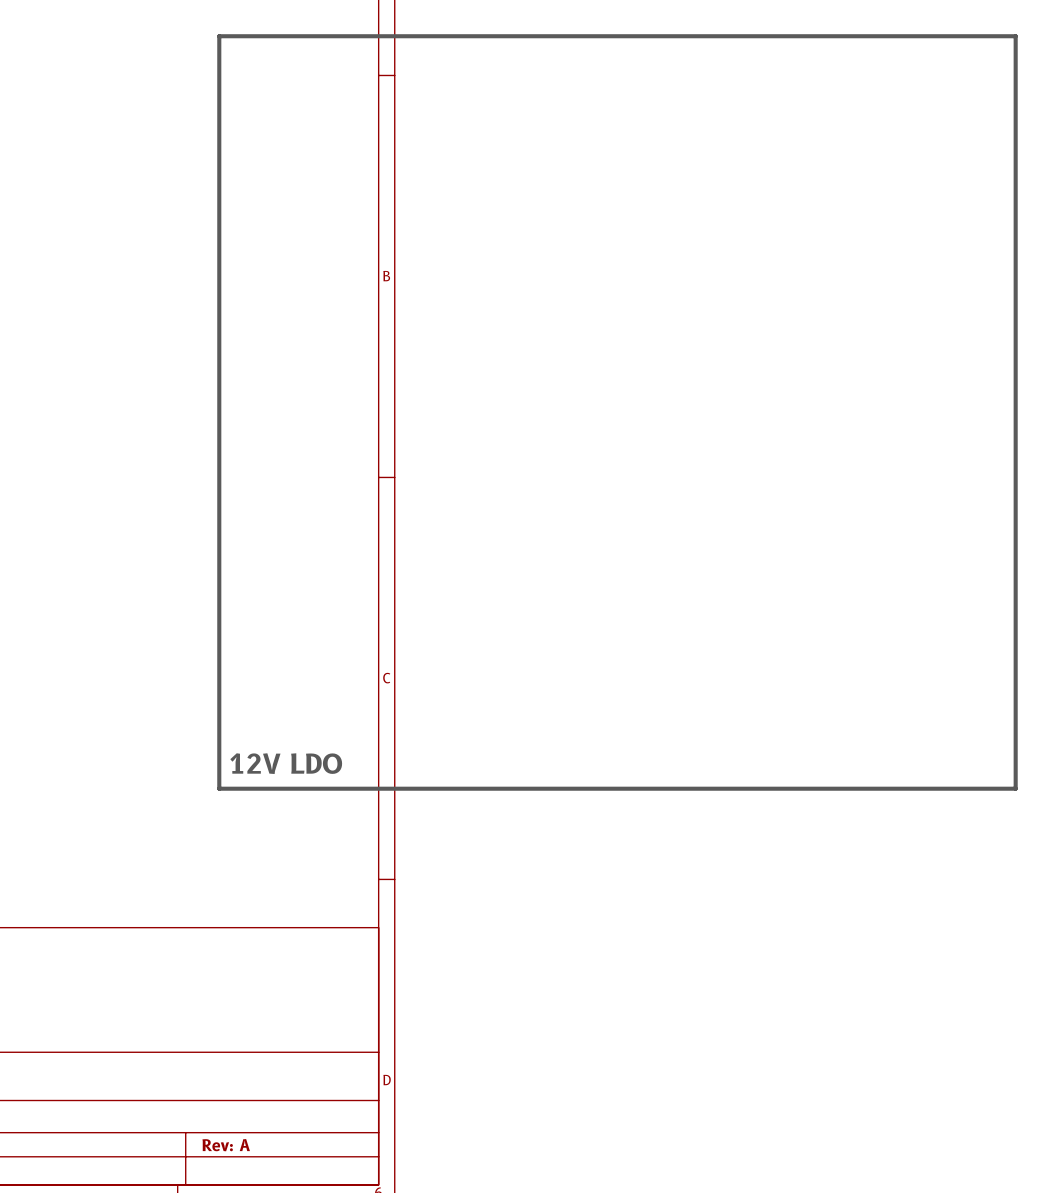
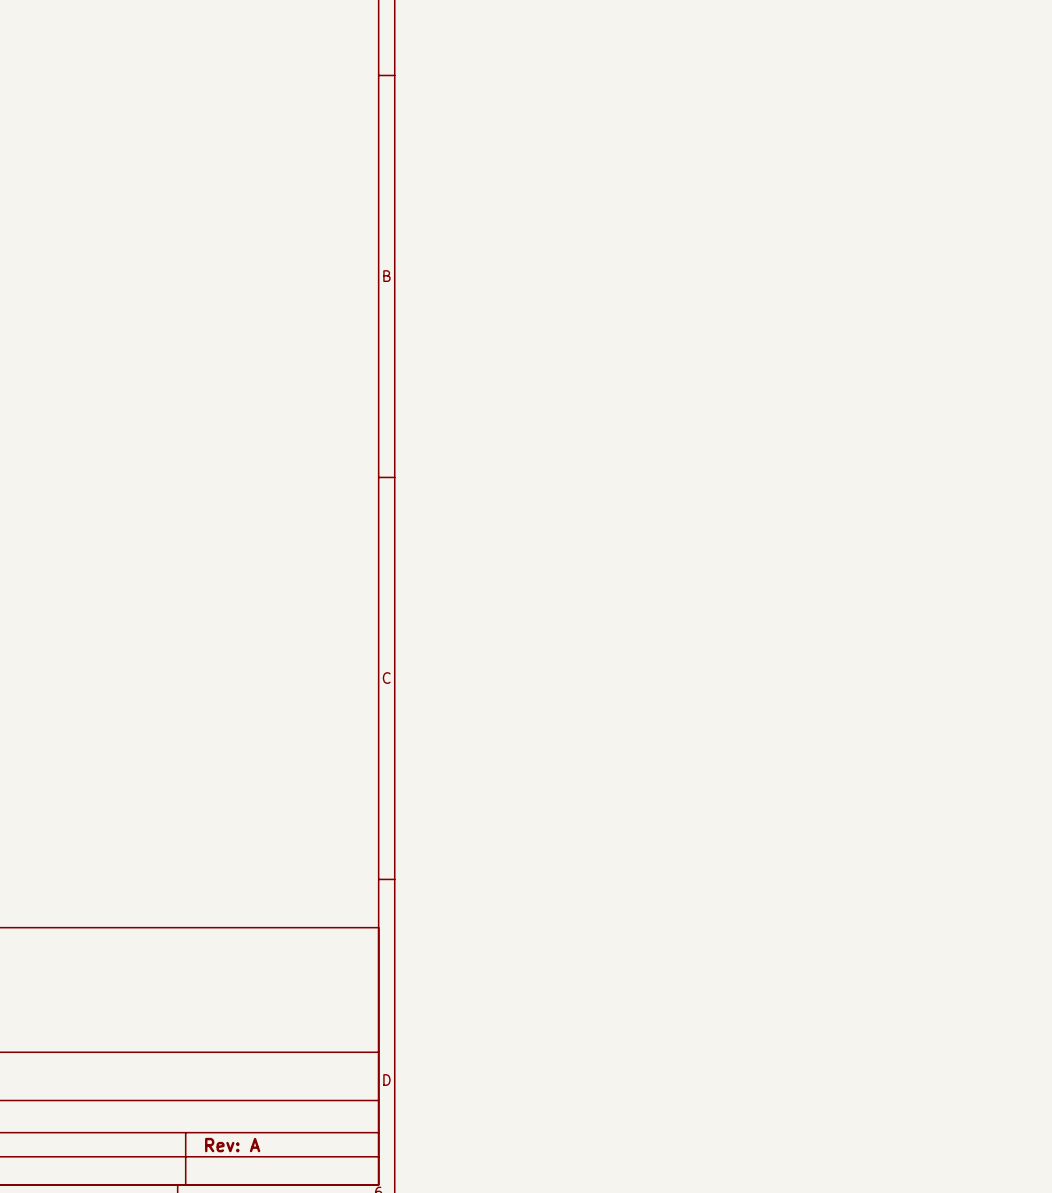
line: (219, 36) (1015, 36) (1015, 788) (219, 788) (219, 36) -> none
text: 12V LDO (286, 763) -> none

